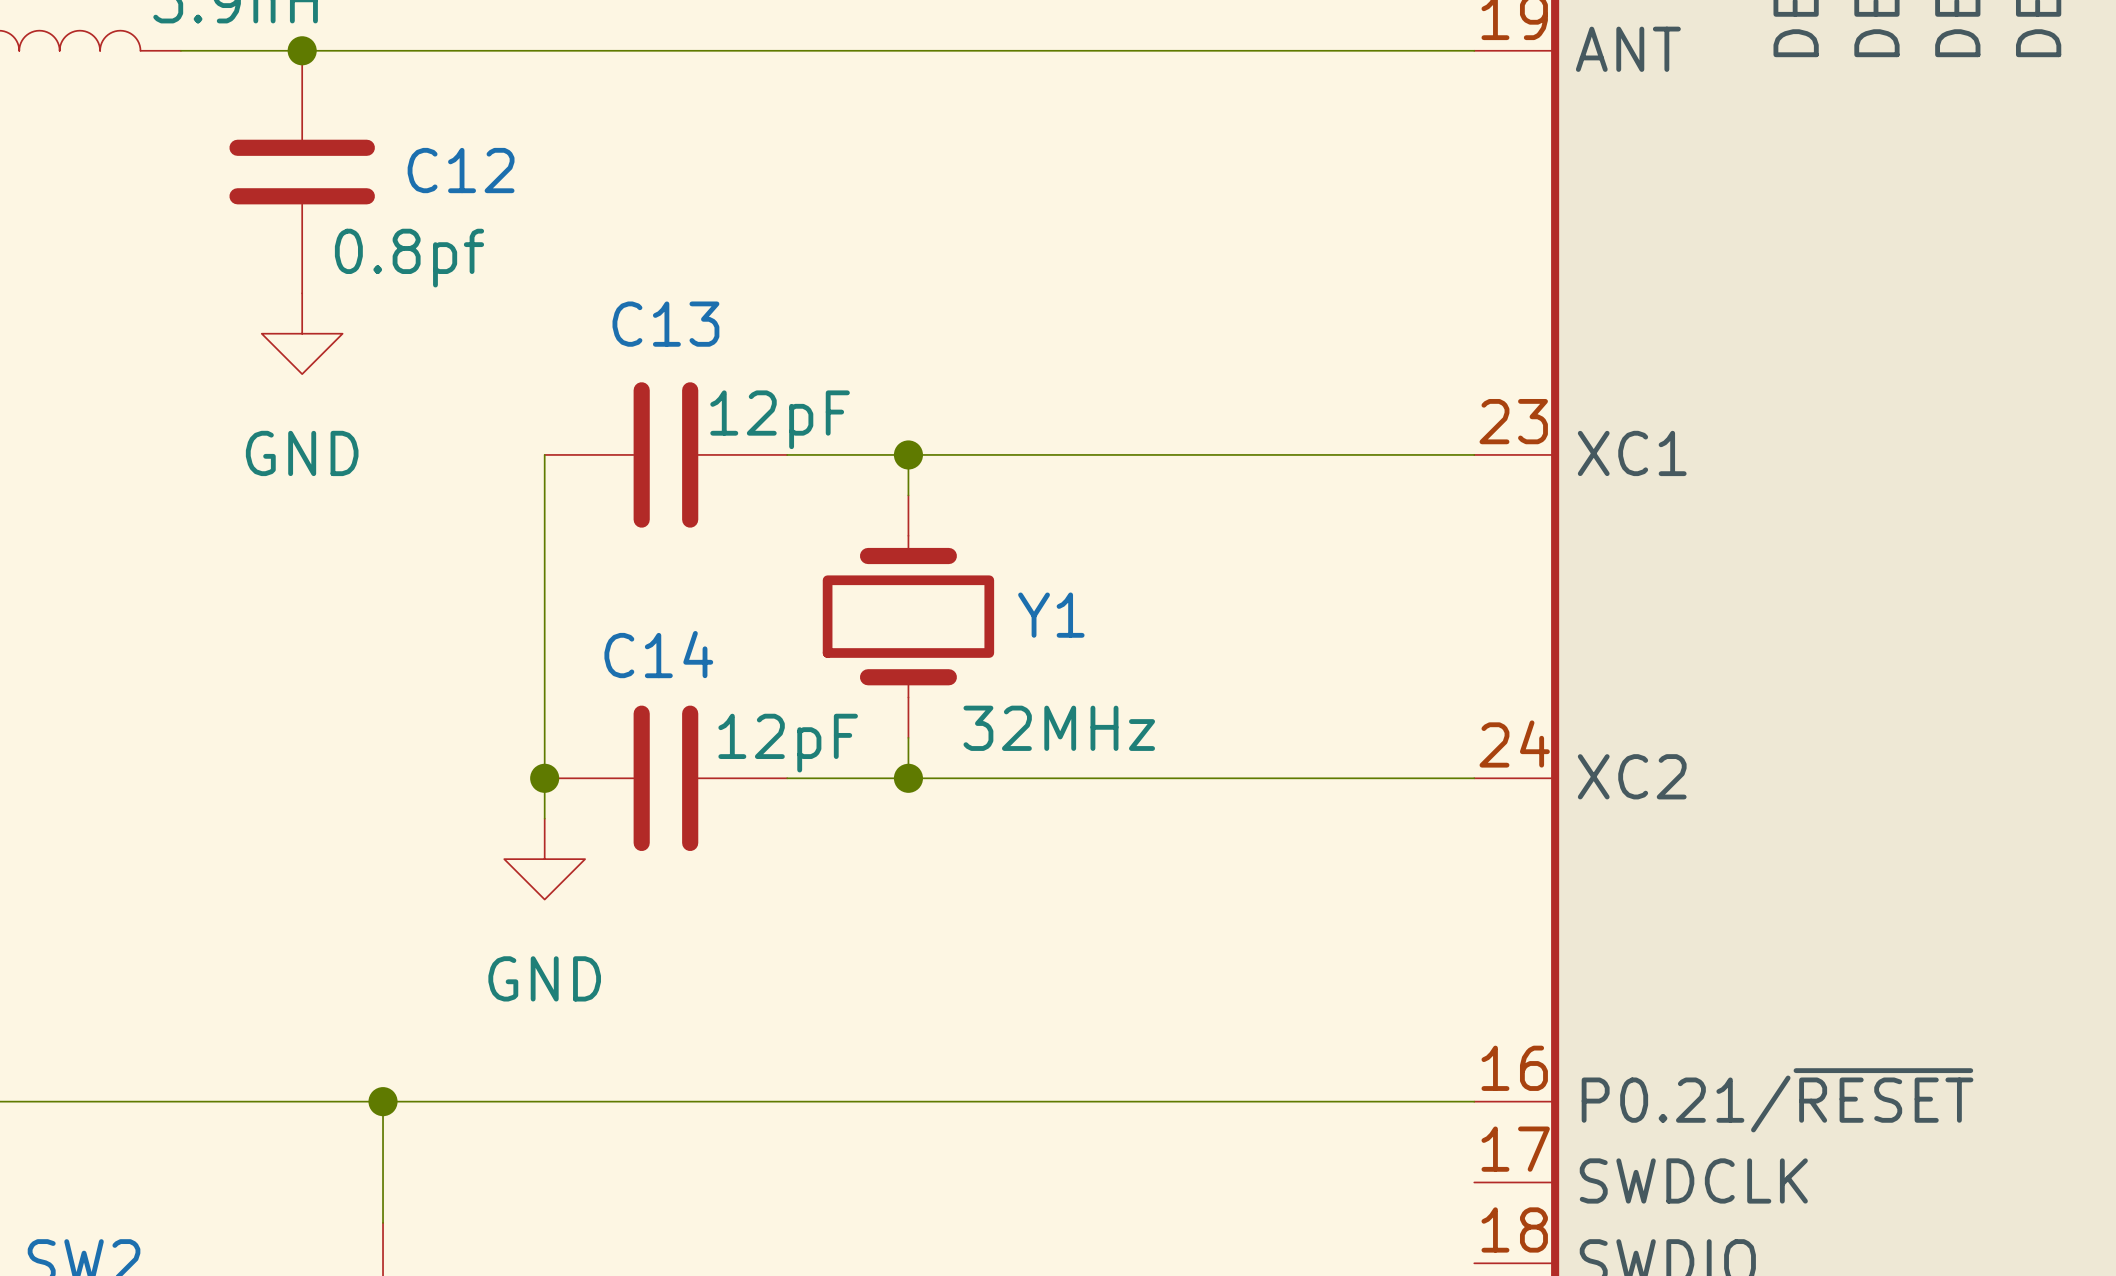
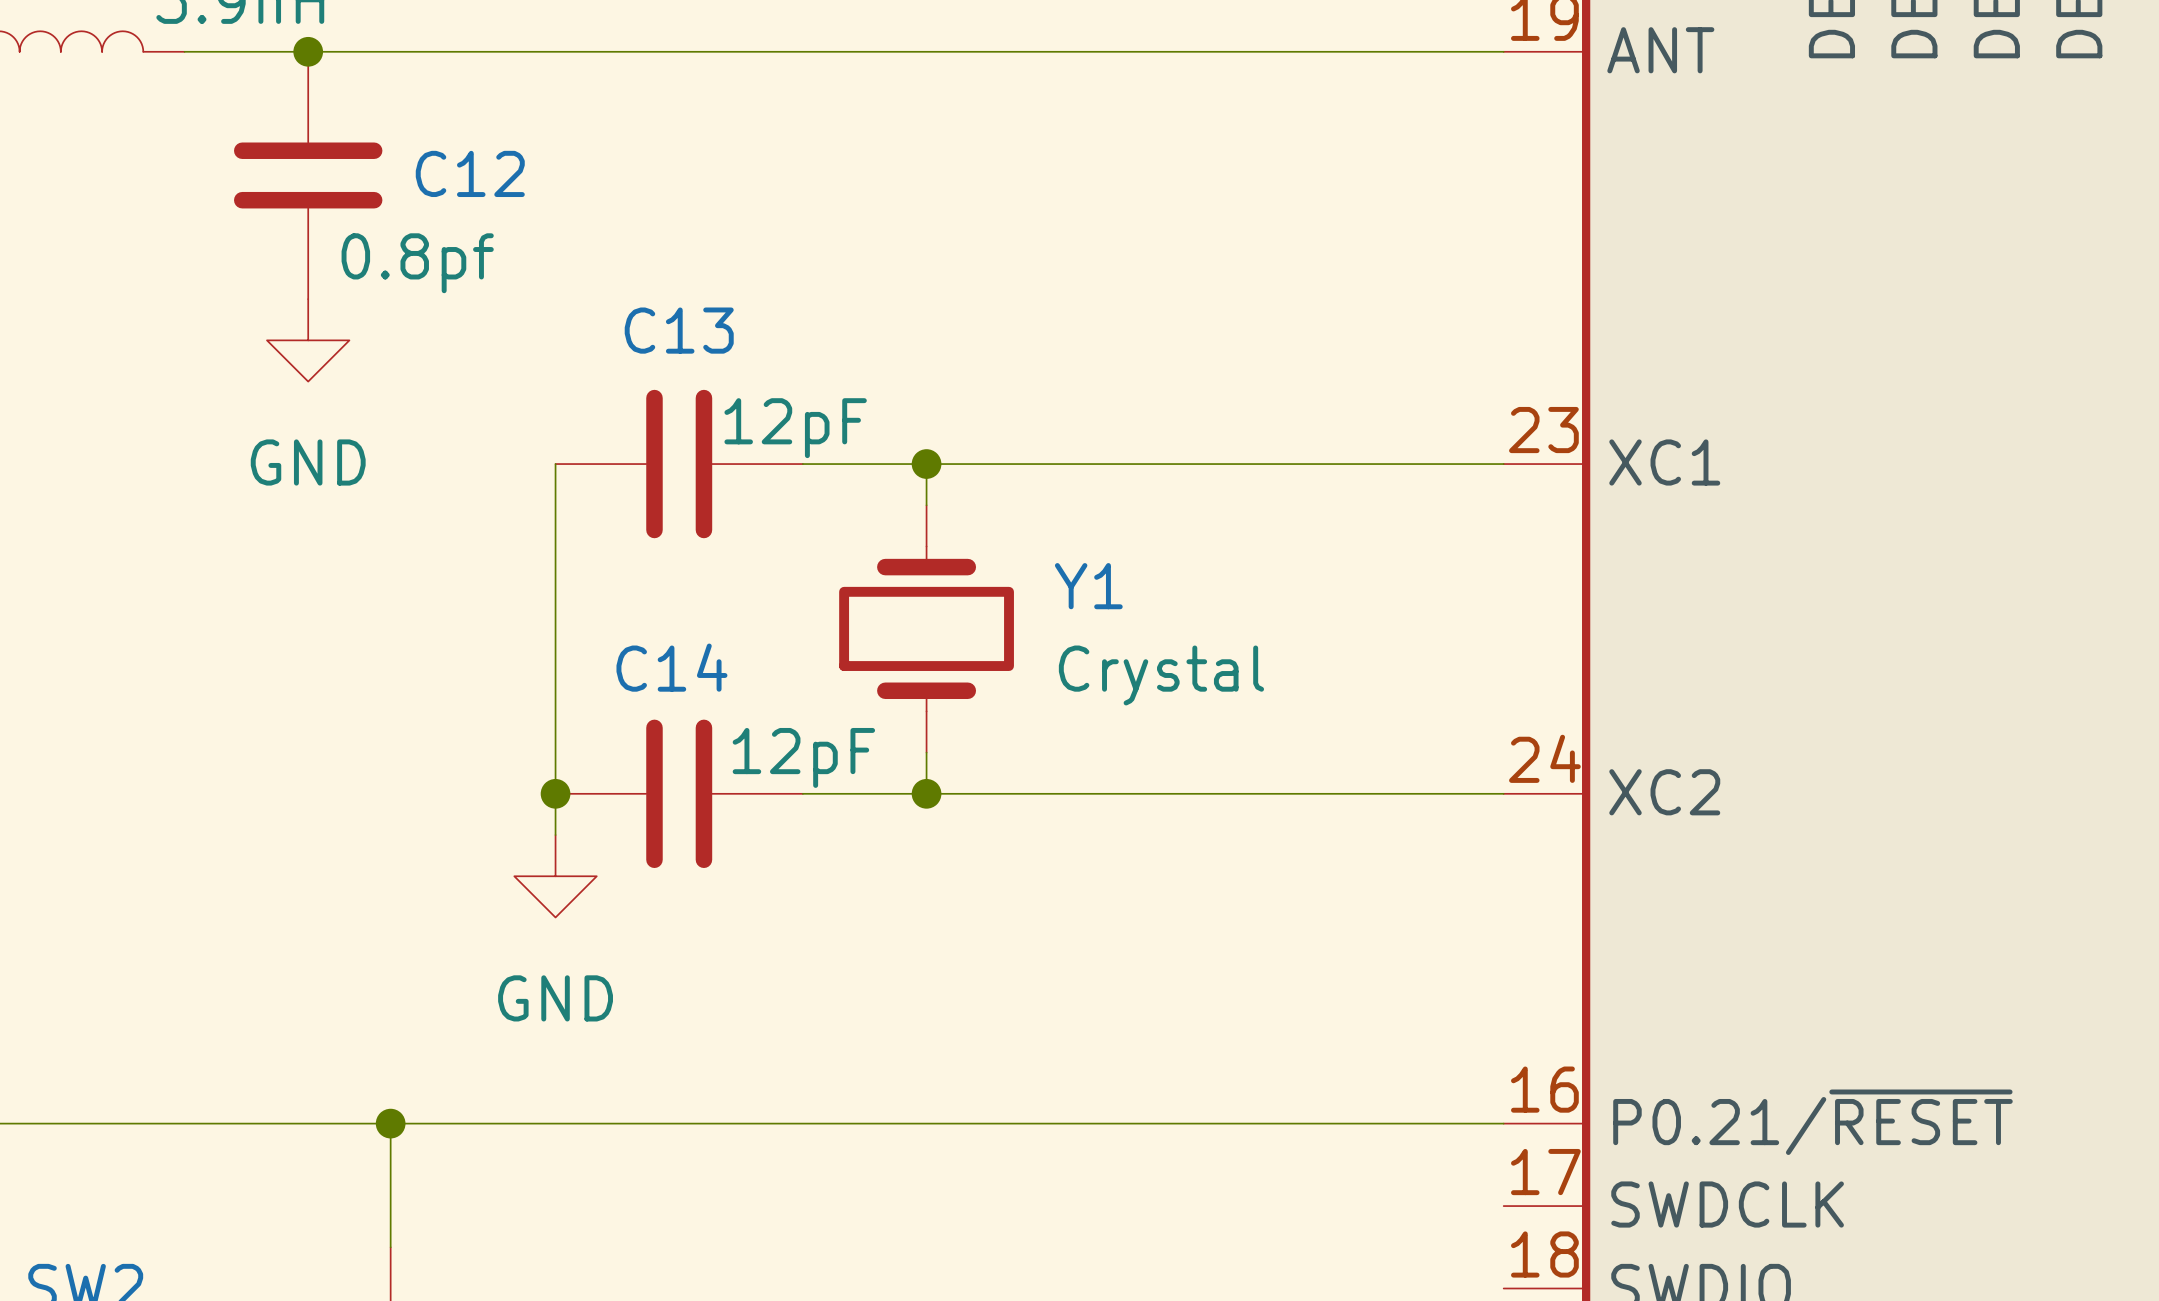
Y1 name position: Y1 (1051, 615) -> Y1 (1088, 586)
Y1 value: 32MHz (1059, 728) -> Crystal (1161, 675)

